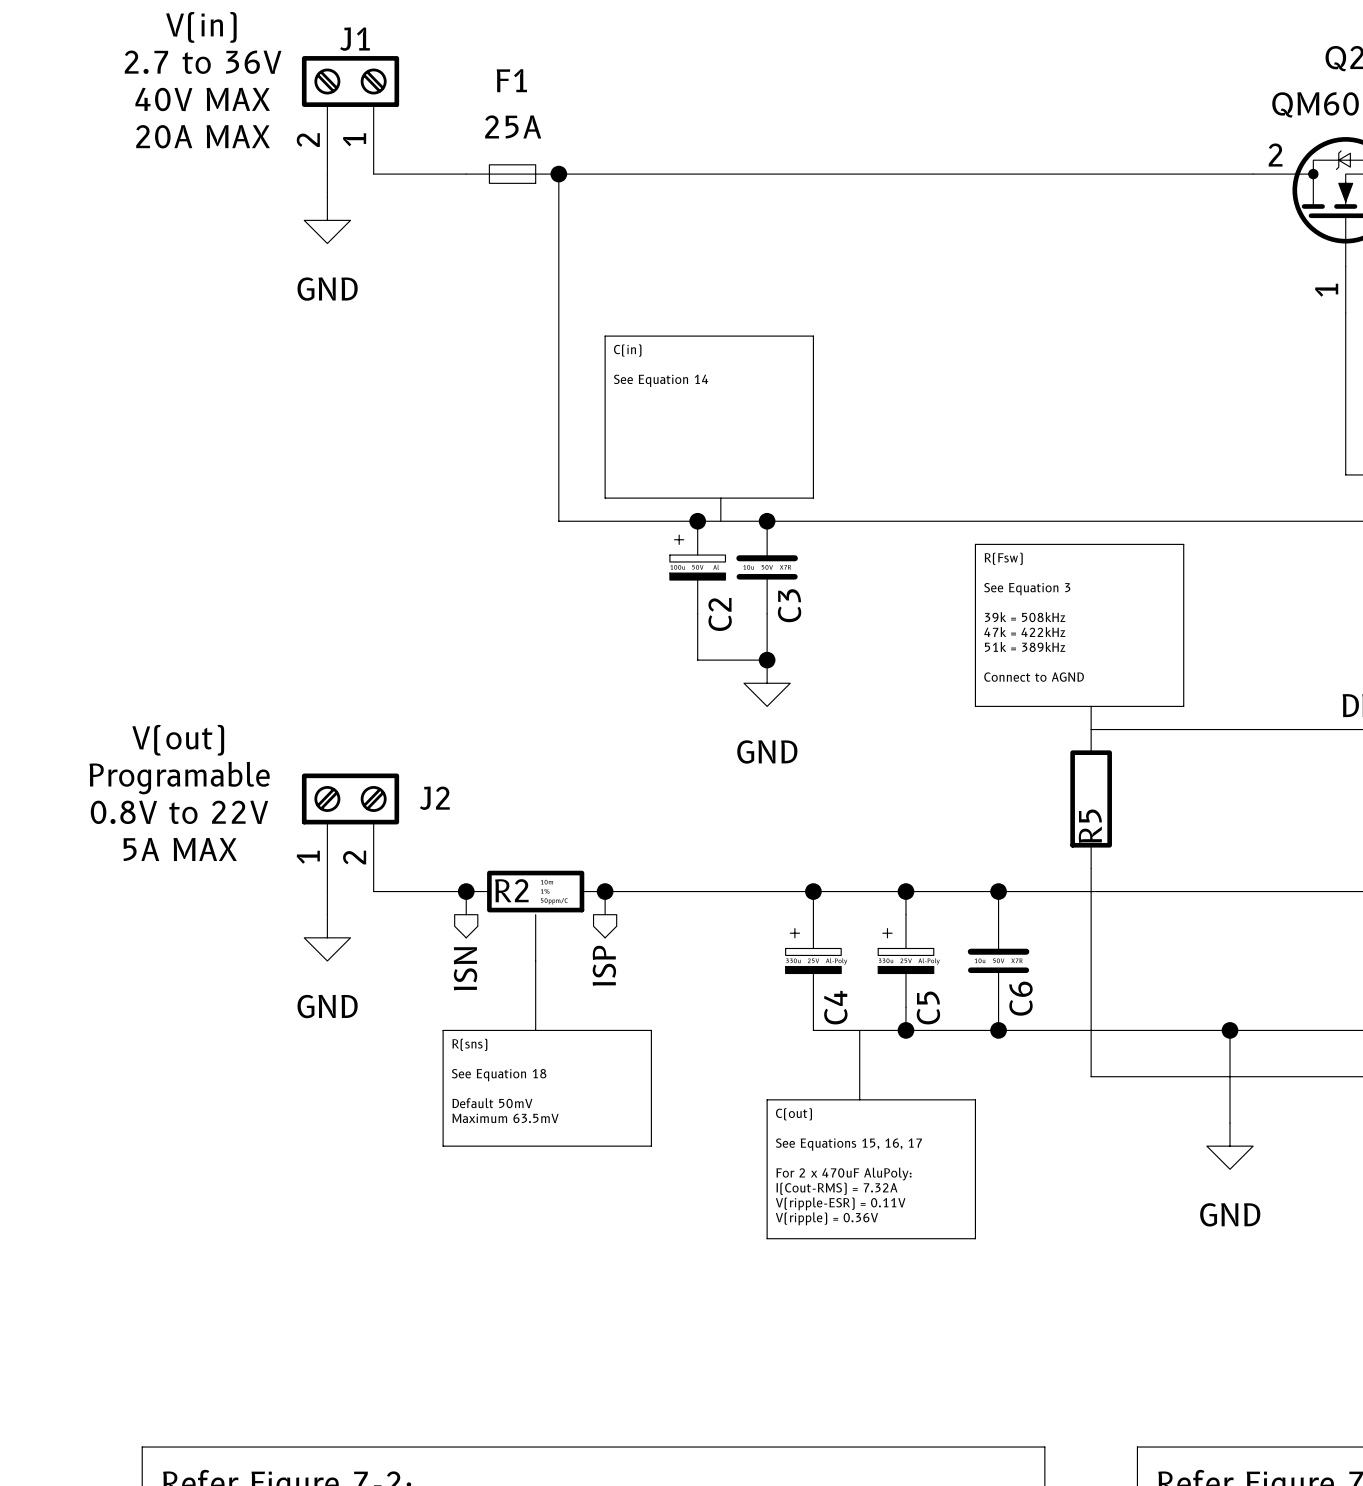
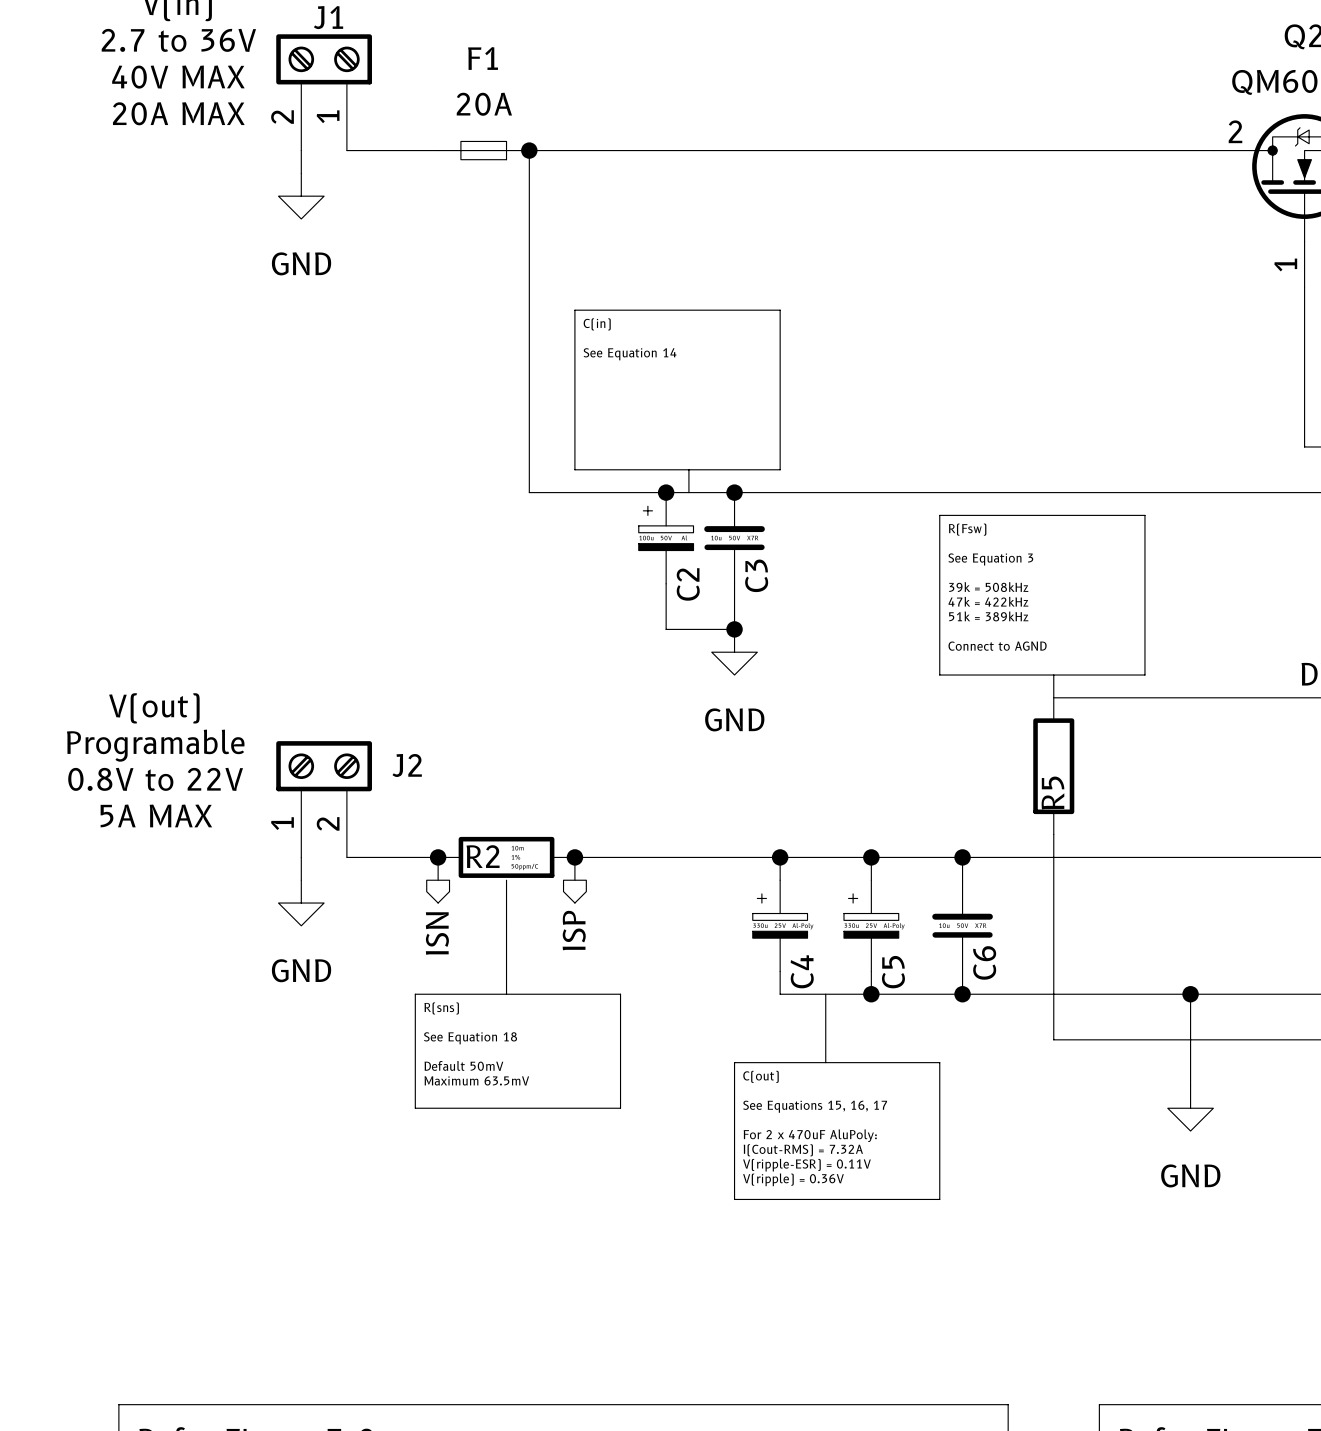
F1 value: 25A (513, 126) -> 20A (484, 104)

